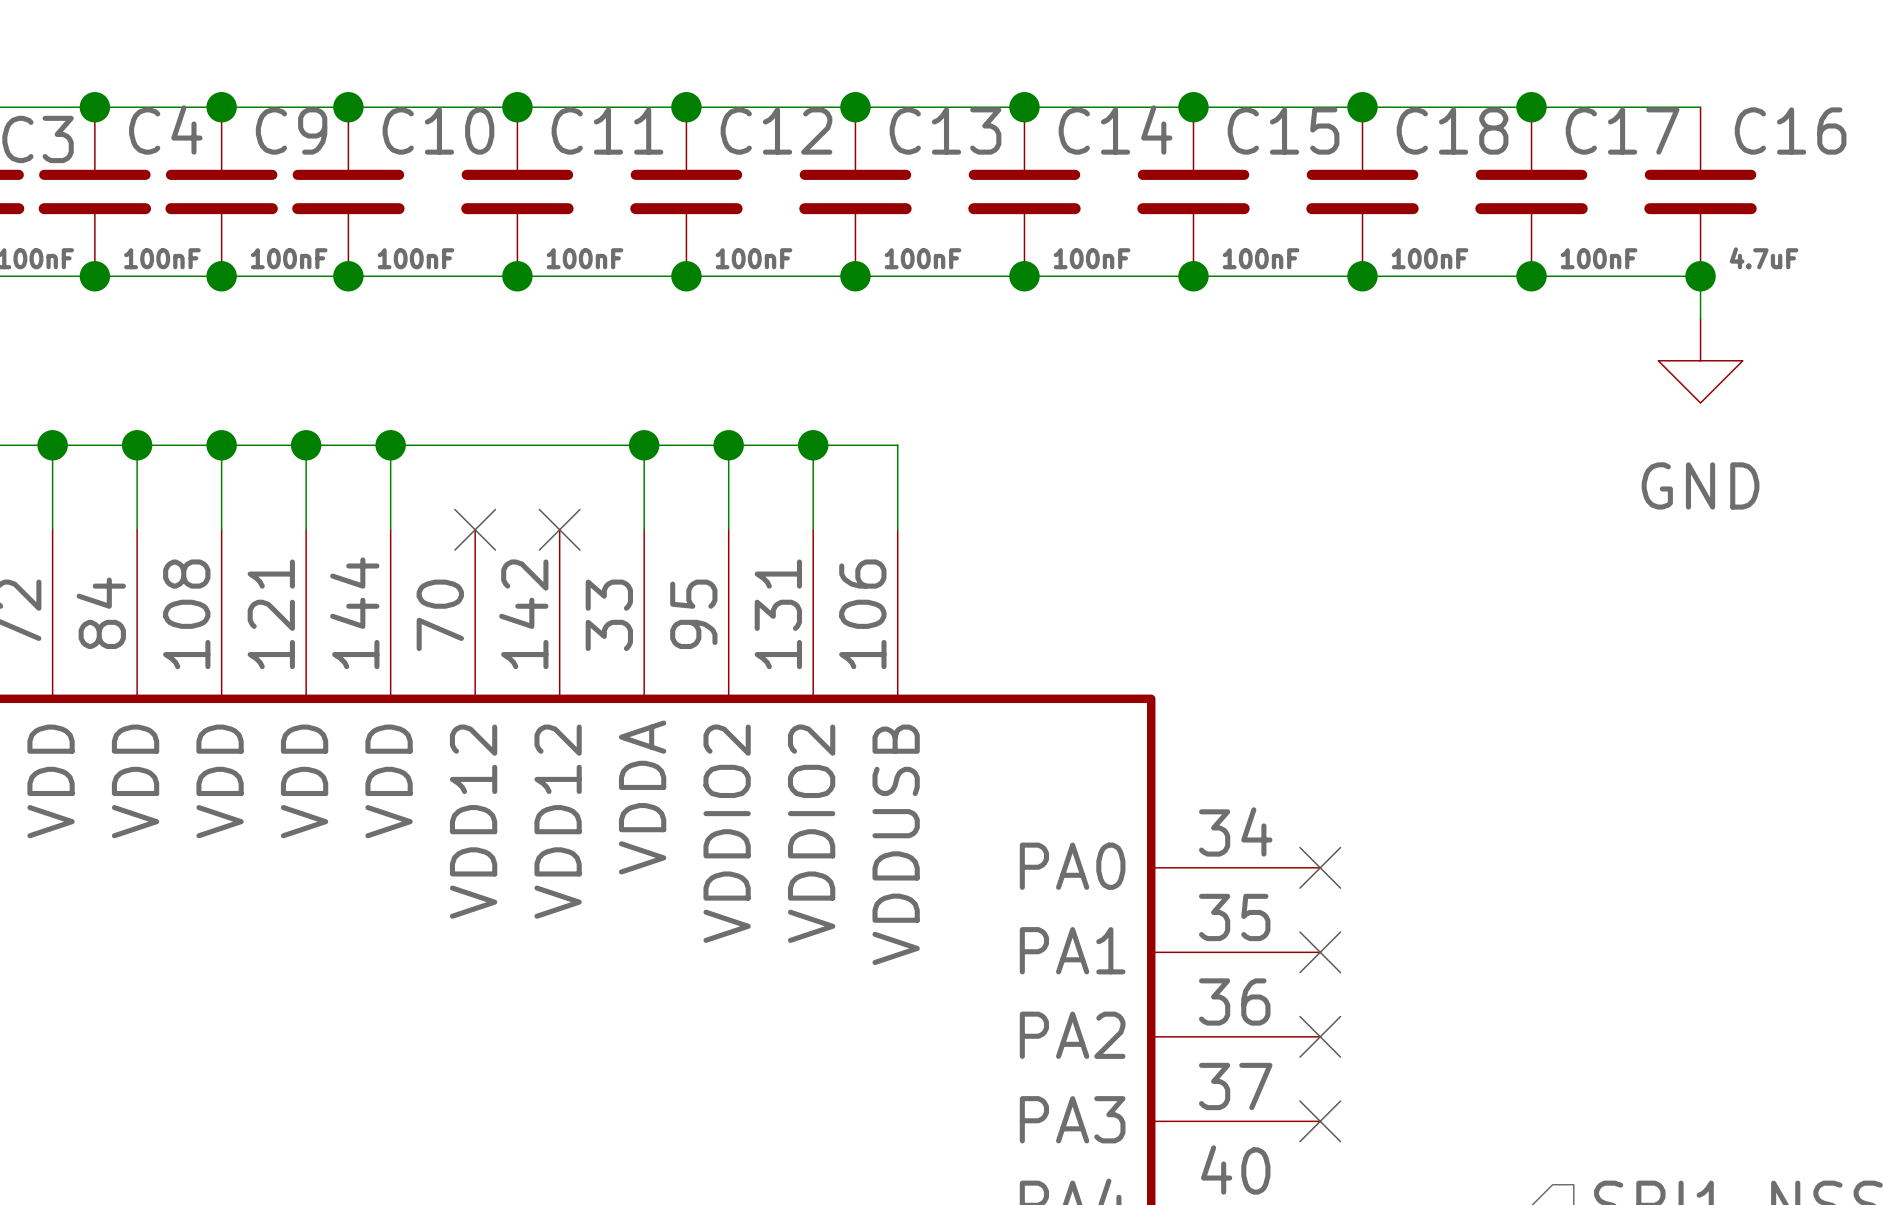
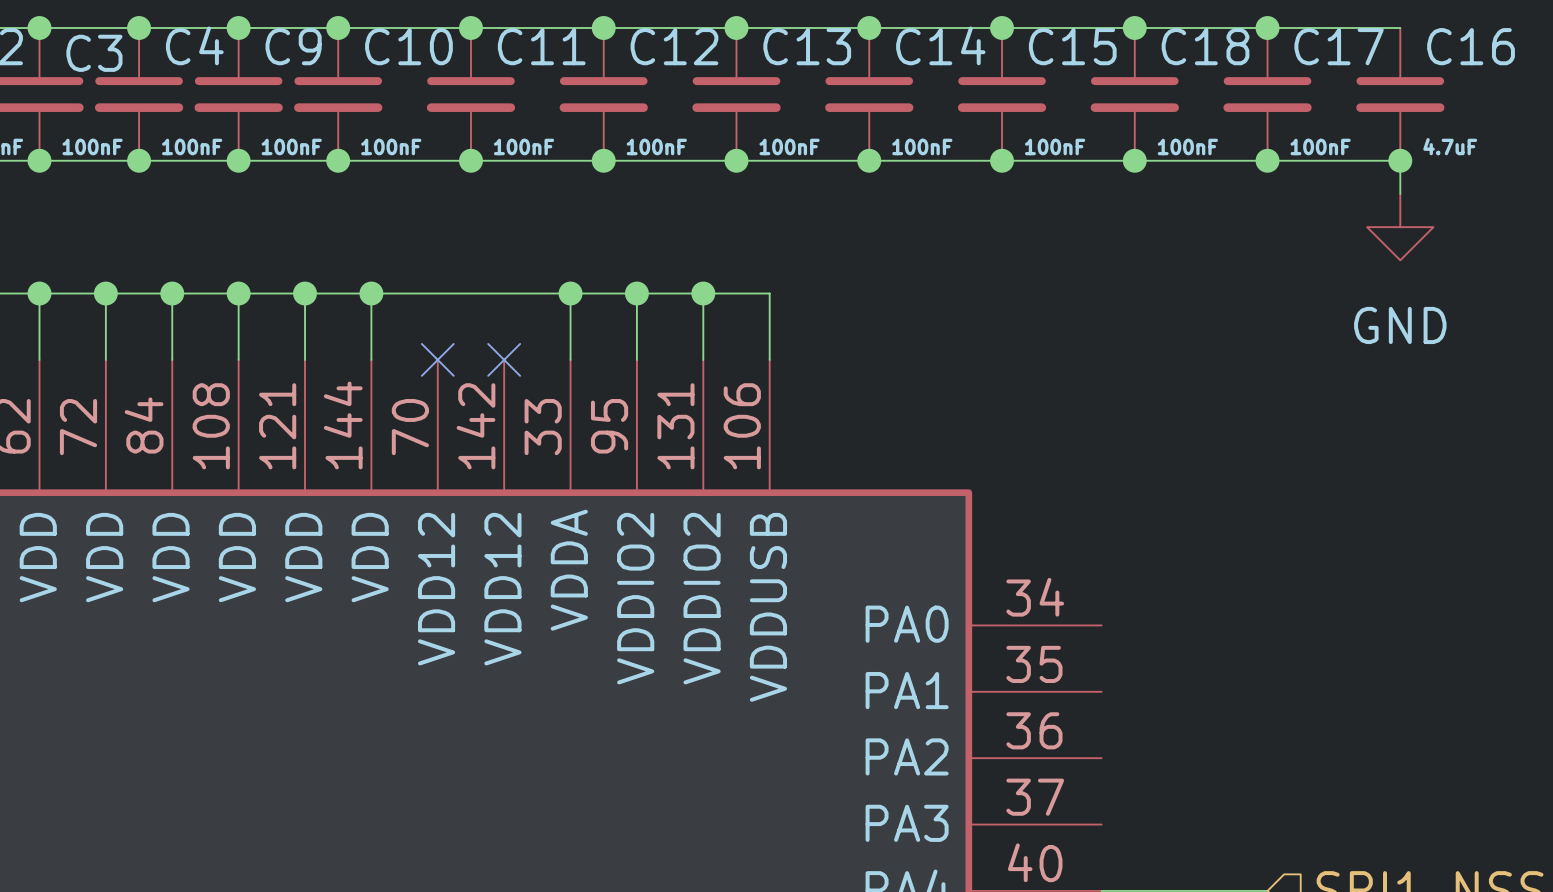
no-connect mark: (1320, 867) -> none
no-connect mark: (1320, 952) -> none
no-connect mark: (1320, 1036) -> none
no-connect mark: (1320, 1121) -> none

